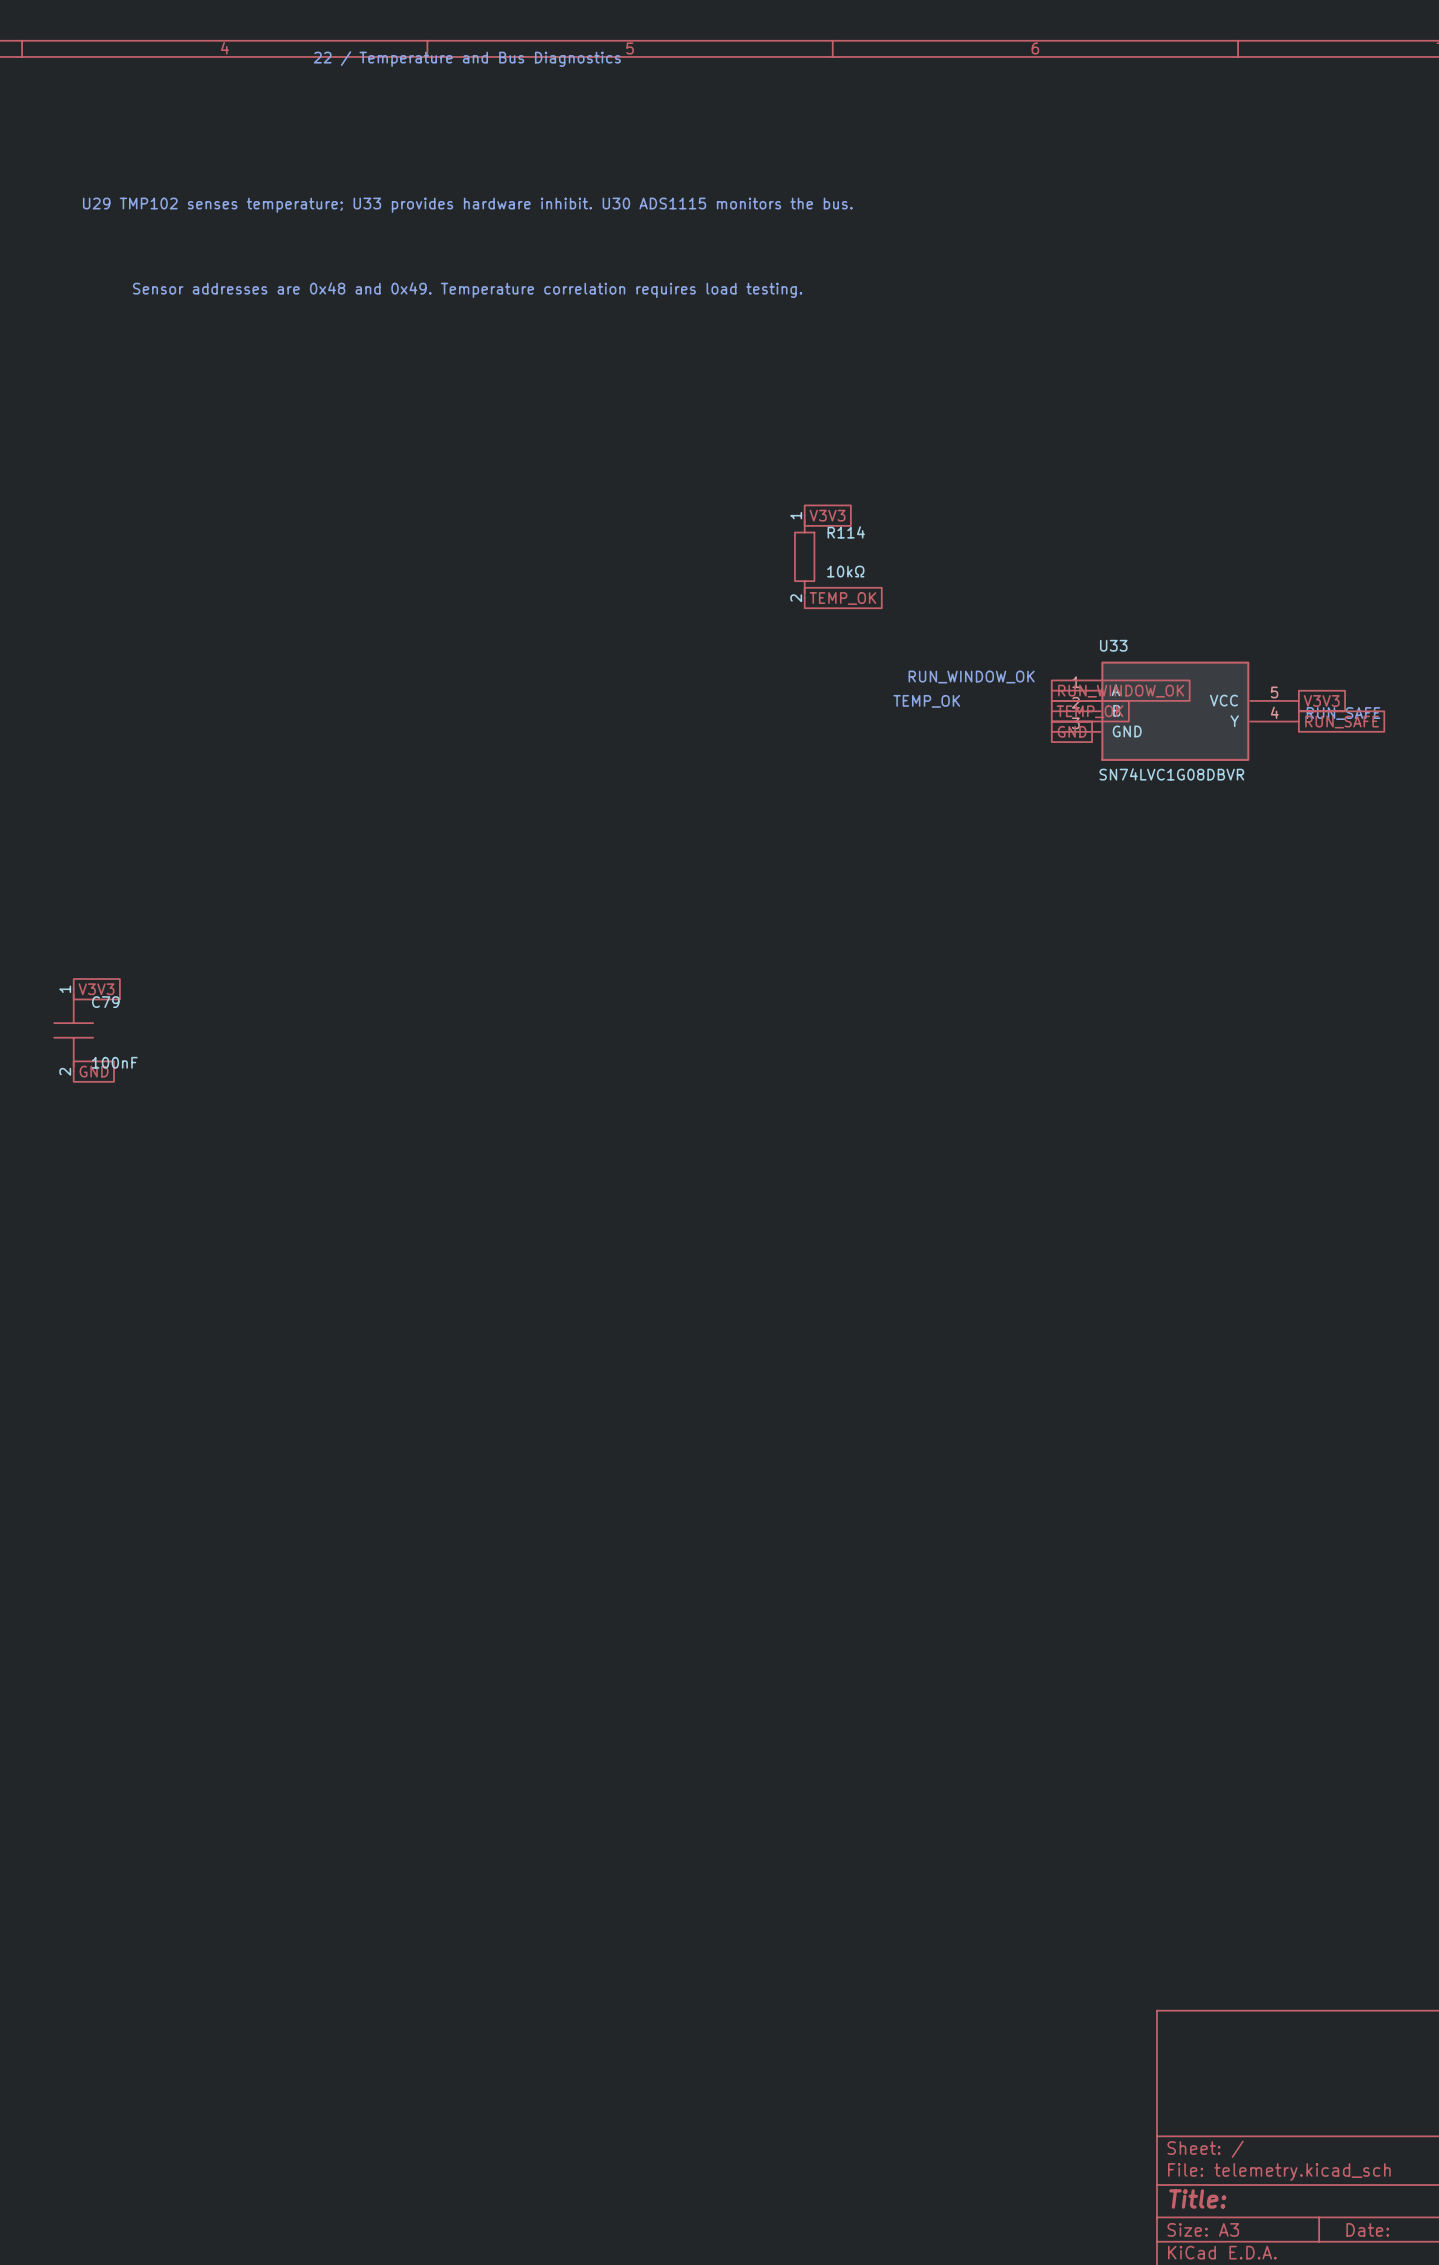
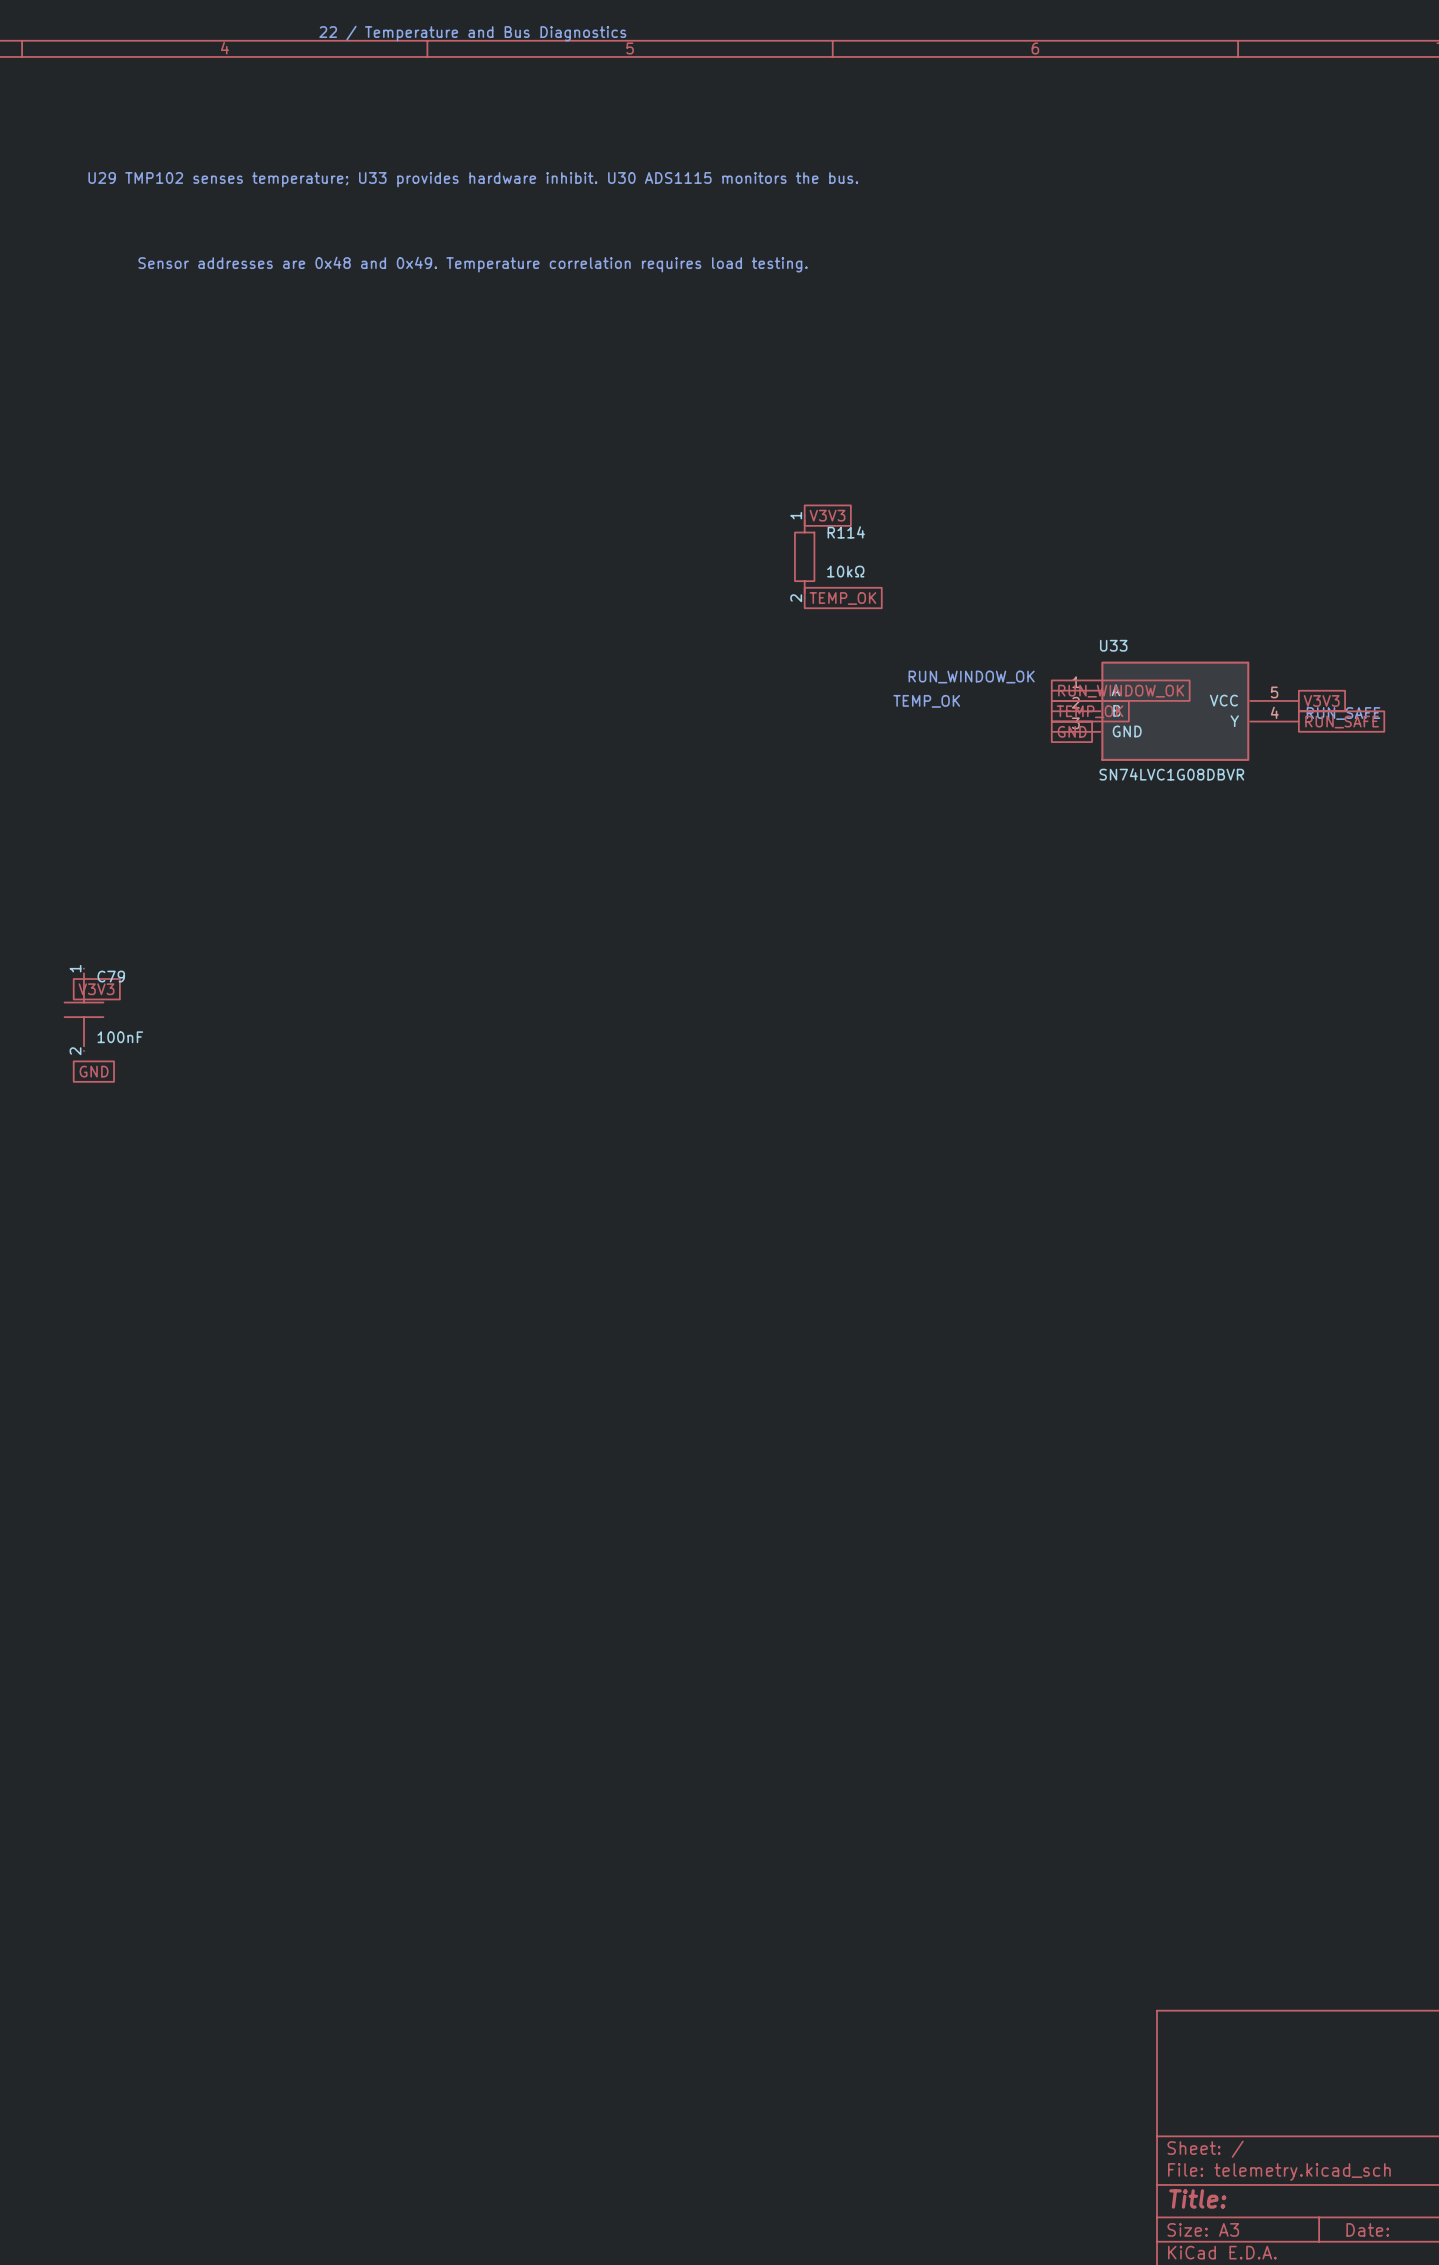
text position: 22 / Temperature and Bus Diagnostics (467, 59) -> 22 / Temperature and Bus Diagnostics (472, 33)
text position: U29 TMP102 senses temperature; U33 provides hardware inhibit. U30 ADS1115 monitors the bus. (467, 205) -> U29 TMP102 senses temperature; U33 provides hardware inhibit. U30 ADS1115 monitors the bus. (473, 179)
text position: Sensor addresses are 0x48 and 0x49. Temperature correlation requires load testing. (467, 290) -> Sensor addresses are 0x48 and 0x49. Temperature correlation requires load testing. (473, 264)
C79 name position: C79 (105, 1002) -> C79 (111, 976)
C79 position: (73, 1030) -> (84, 1009)
C79 value position: 100nF (114, 1062) -> 100nF (120, 1037)

